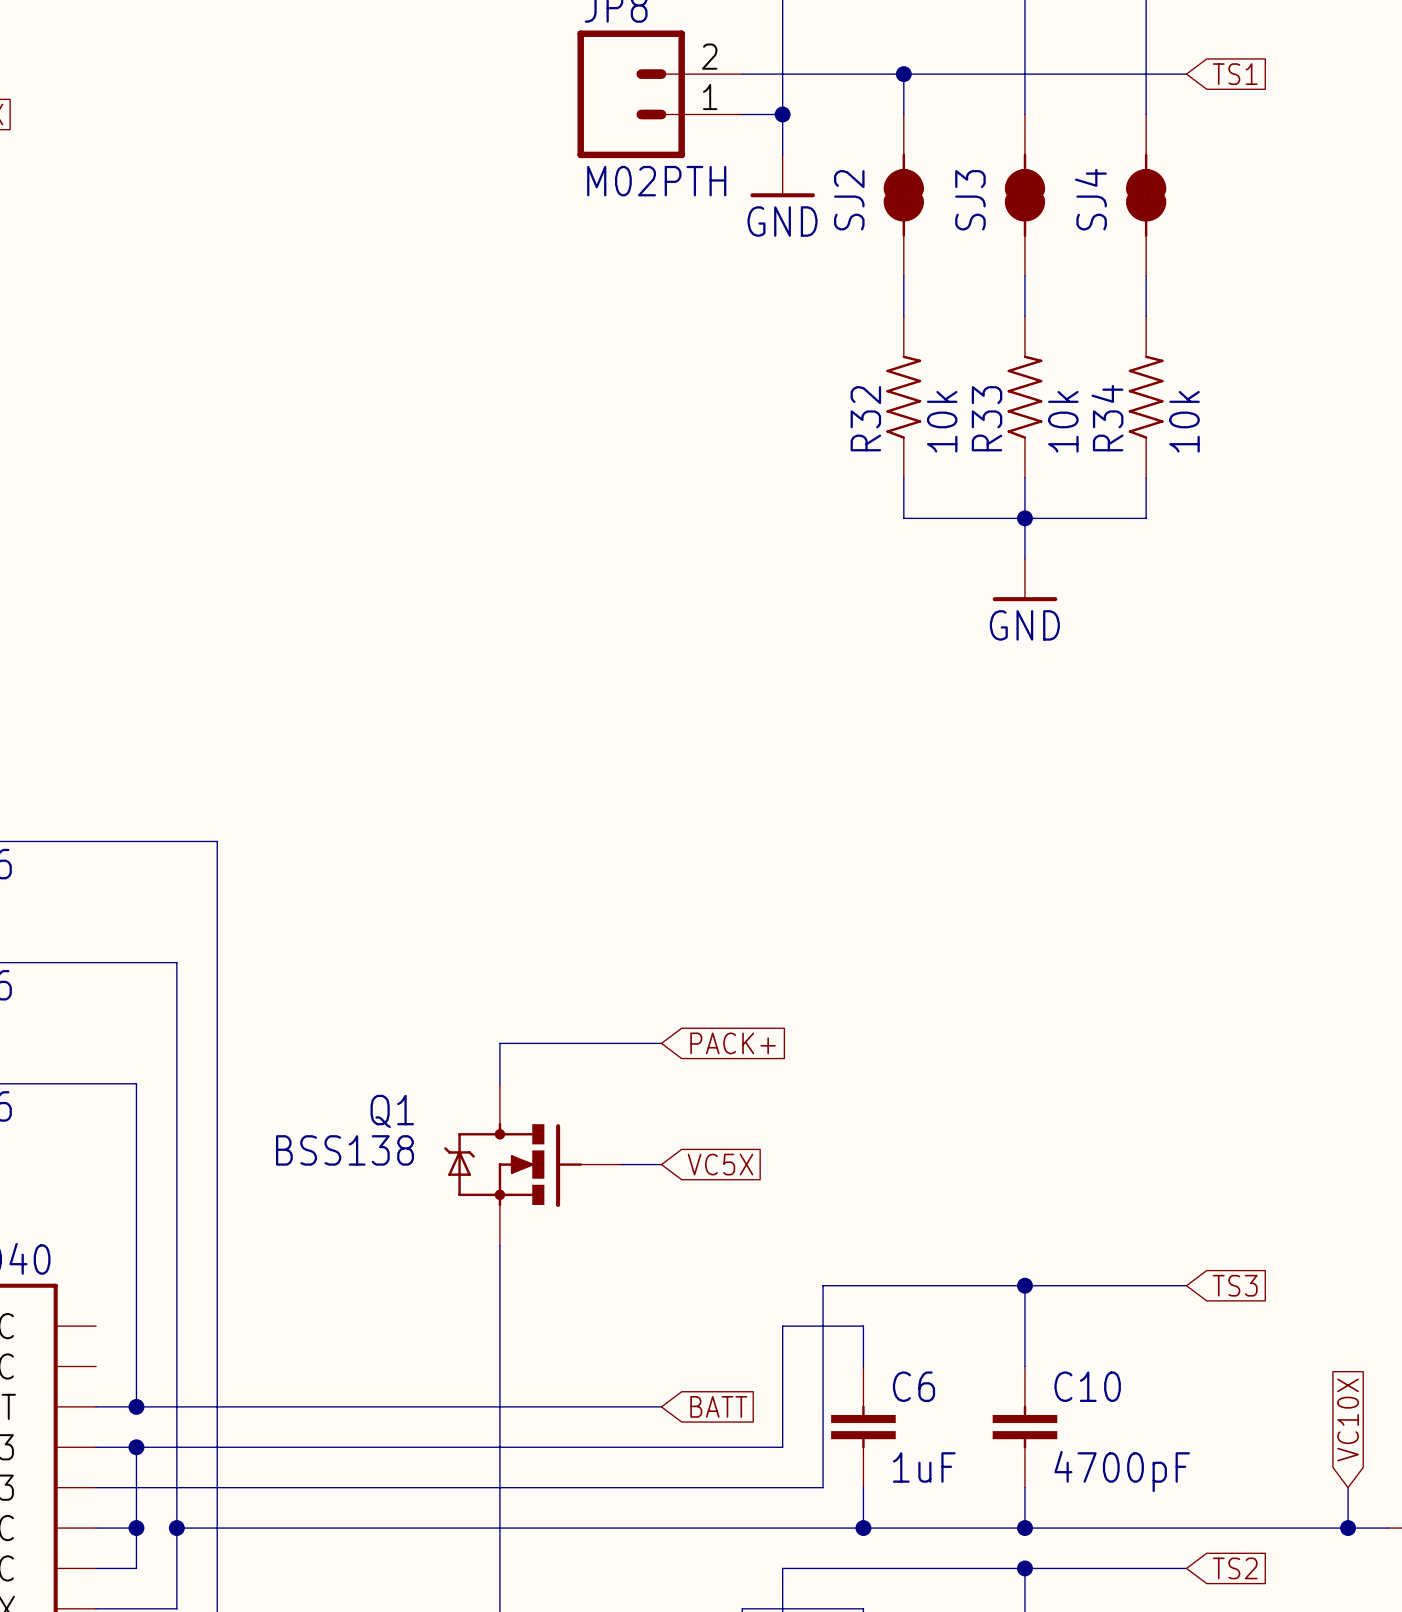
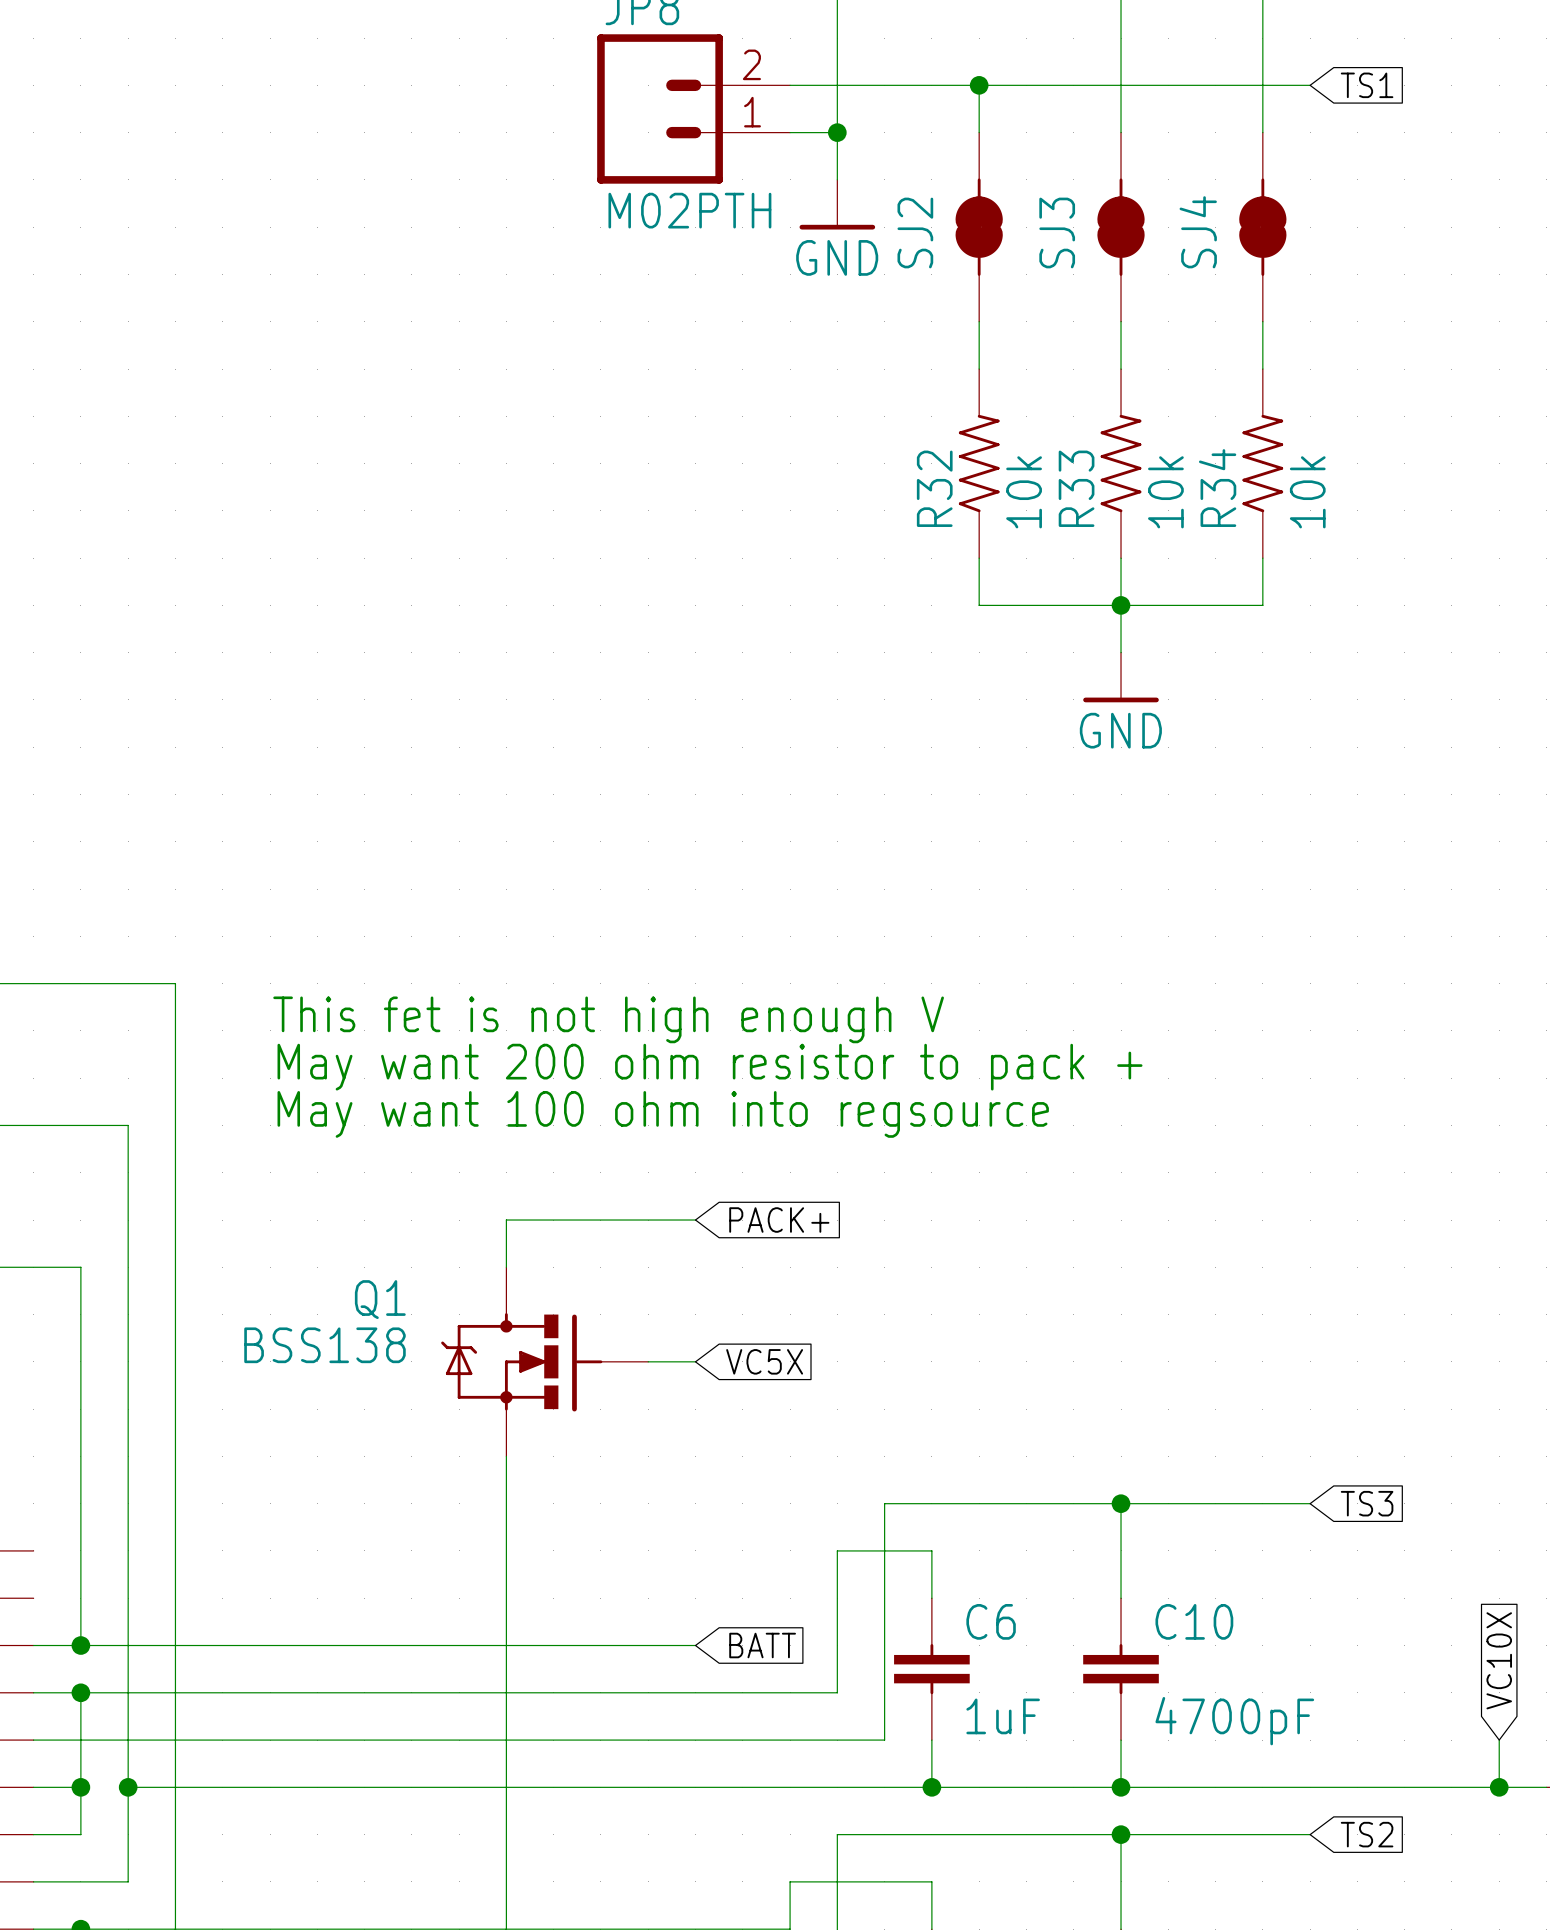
text: none -> This fet is not high enough V (608, 1019)
text: none -> May want 200 ohm resistor to pack + (710, 1067)
text: none -> May want 100 ohm into regsource (663, 1114)

